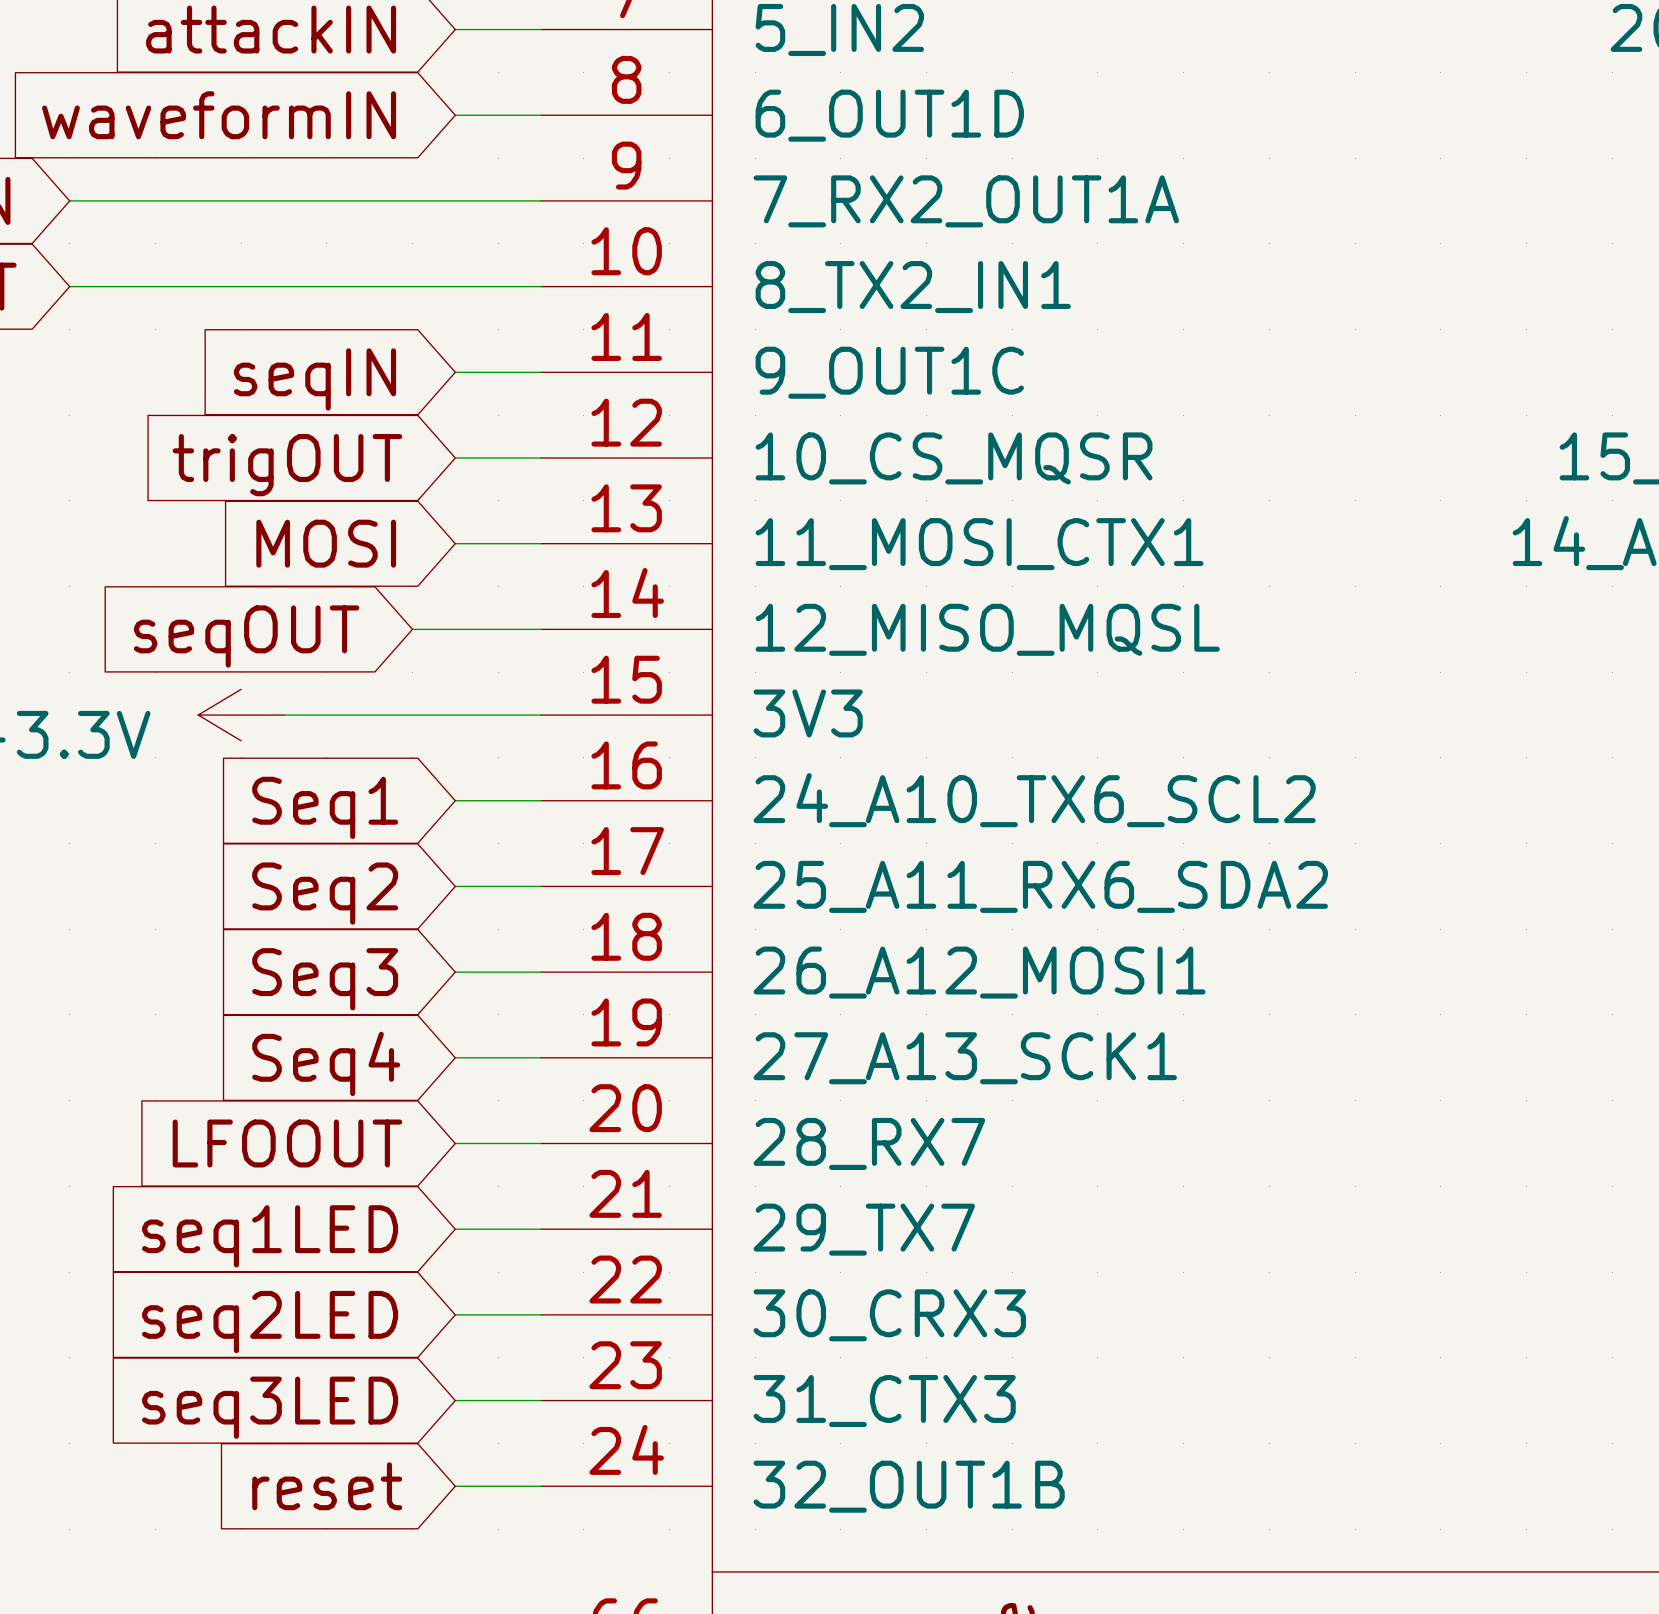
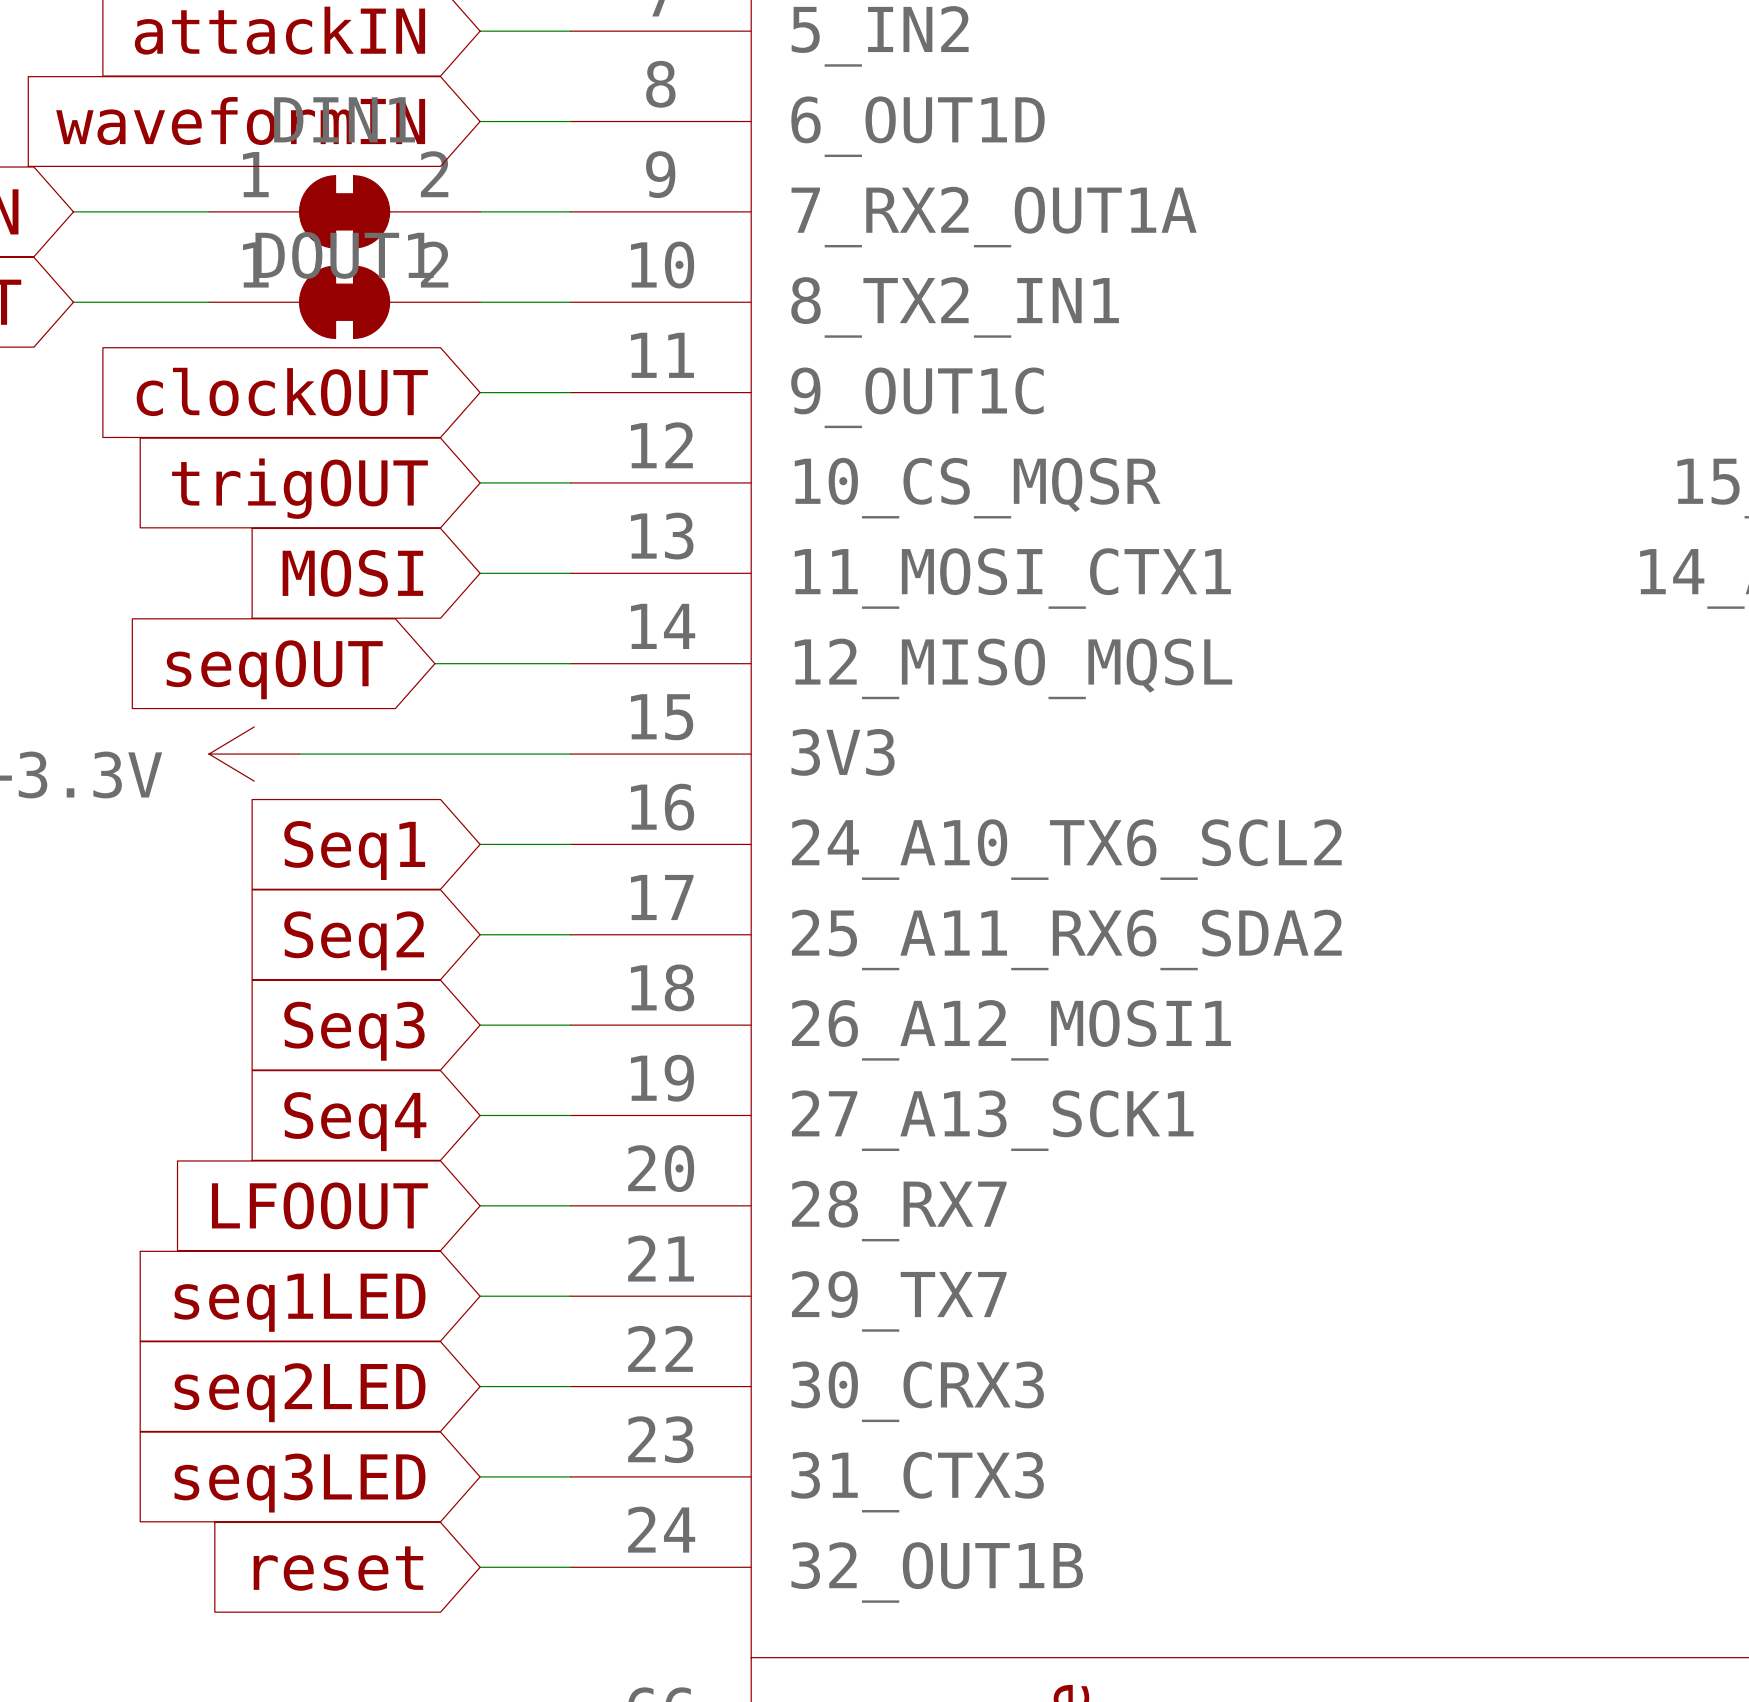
DIN1: none -> (344, 211)
DOUT1: none -> (344, 302)
global label: seqIN (314, 379) -> clockOUT (282, 391)

